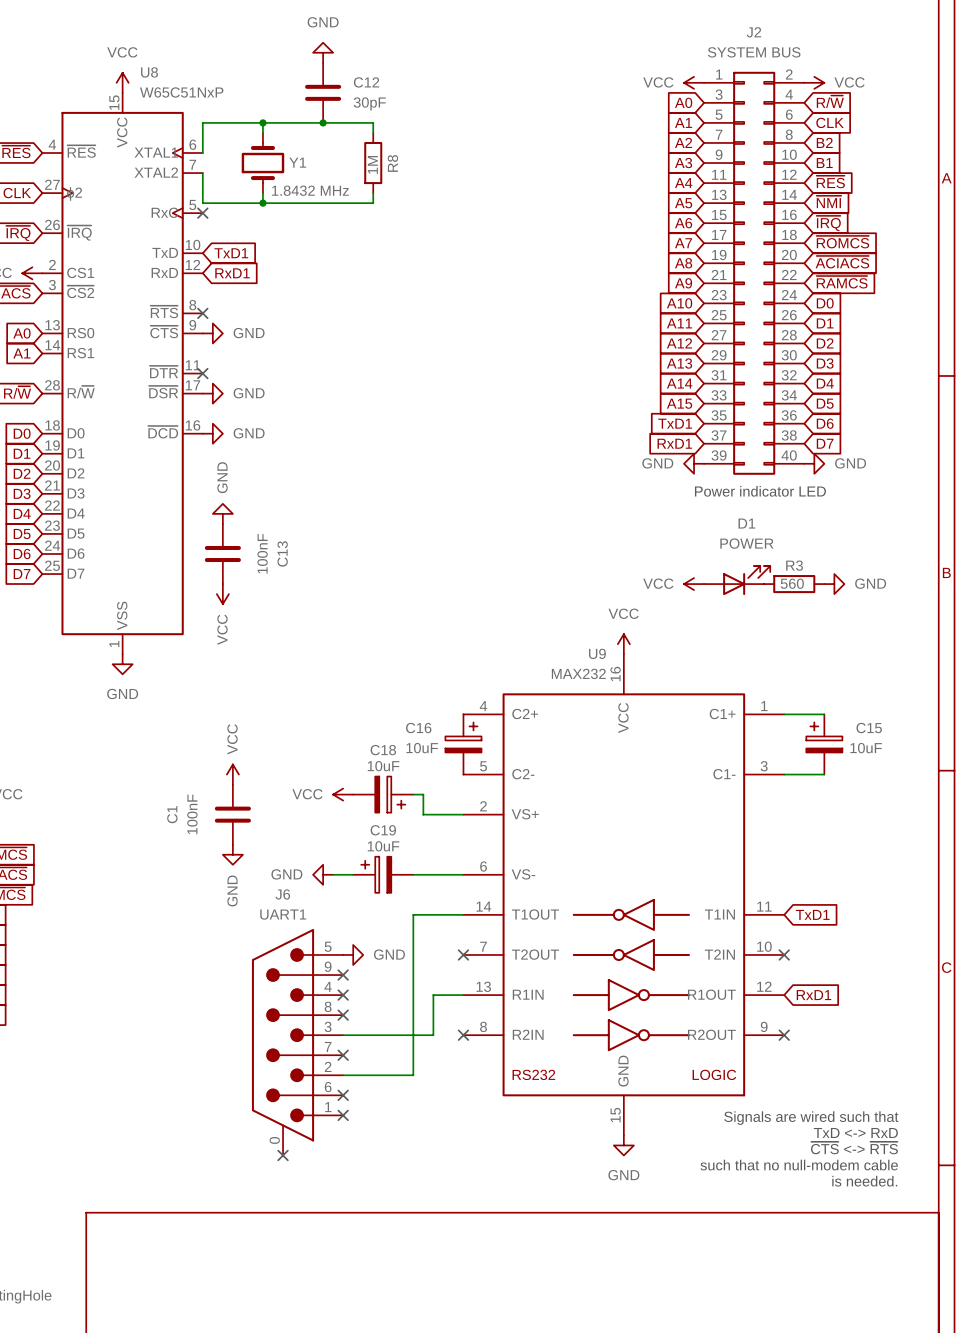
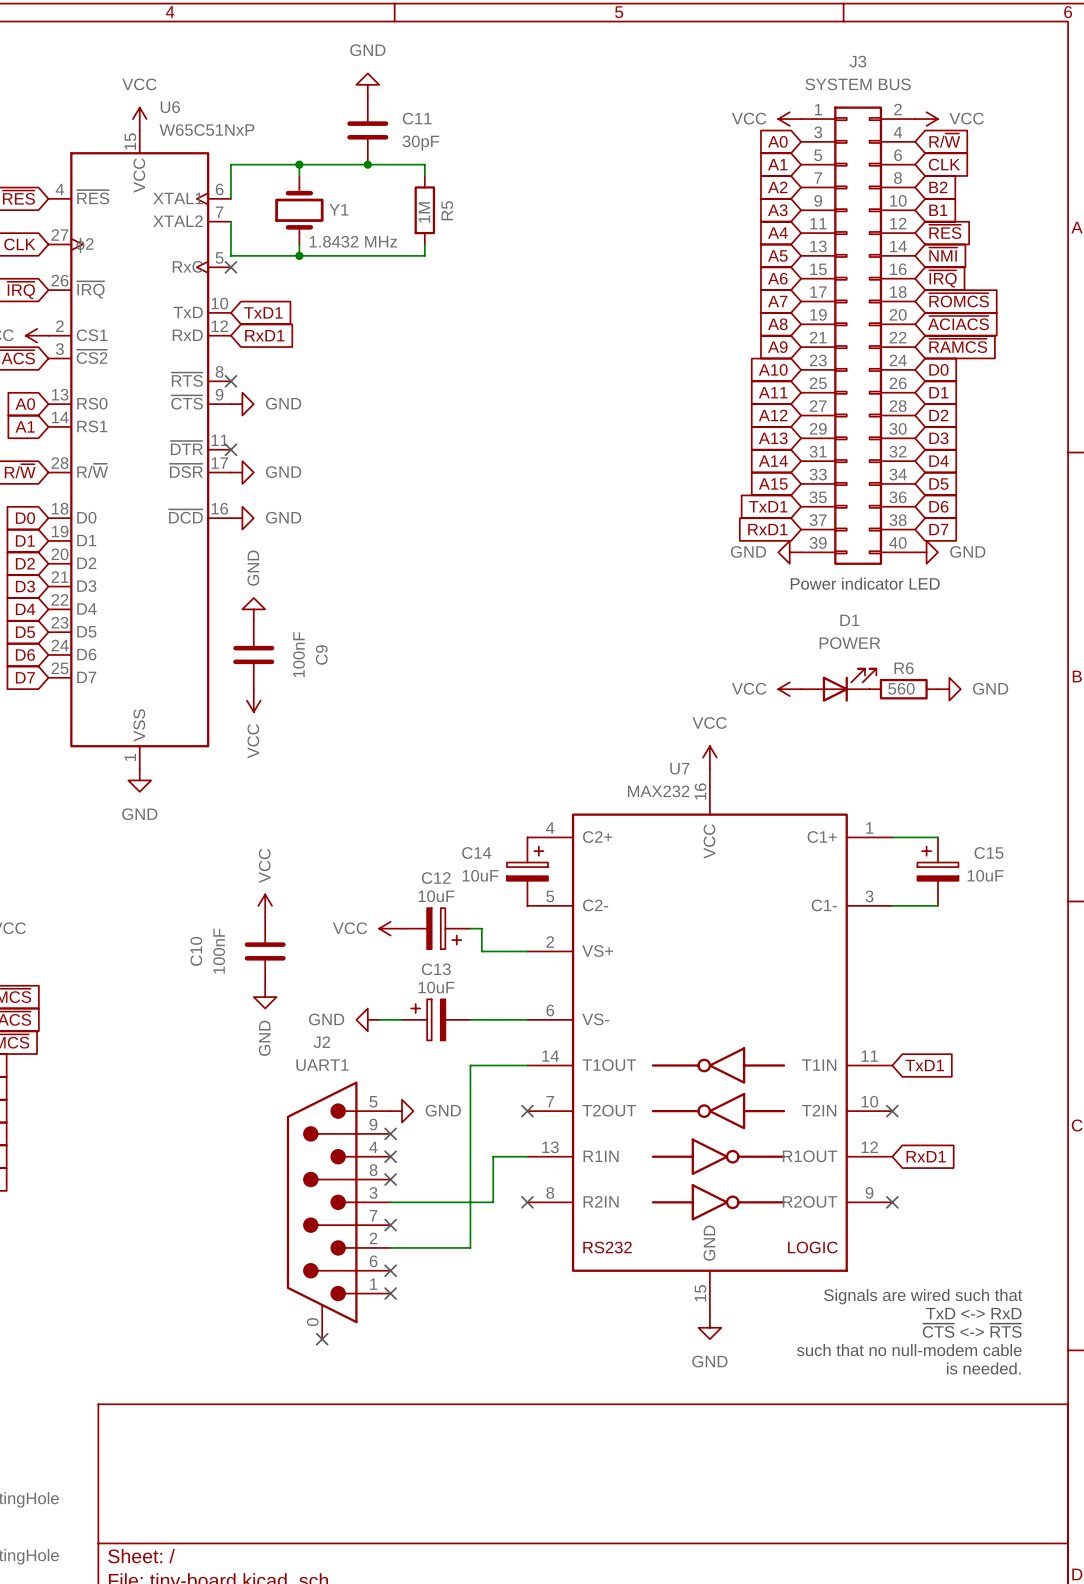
J2 name: J2 (753, 32) -> J3 (857, 61)
U8 name: U8 (149, 72) -> U6 (170, 107)
C12 name: C12 (366, 82) -> C11 (417, 118)
R8 name: R8 (392, 163) -> R5 (447, 210)
C13 name: C13 (282, 553) -> C9 (321, 654)
R3 name: R3 (794, 565) -> R6 (904, 668)
U9 name: U9 (597, 653) -> U7 (679, 768)
C16 name: C16 (418, 728) -> C14 (476, 852)
C18 name: C18 (383, 750) -> C12 (436, 878)
C1 name: C1 (172, 814) -> C10 (196, 951)
C19 name: C19 (383, 830) -> C13 (436, 969)
J6 name: J6 (282, 894) -> J2 (321, 1042)

